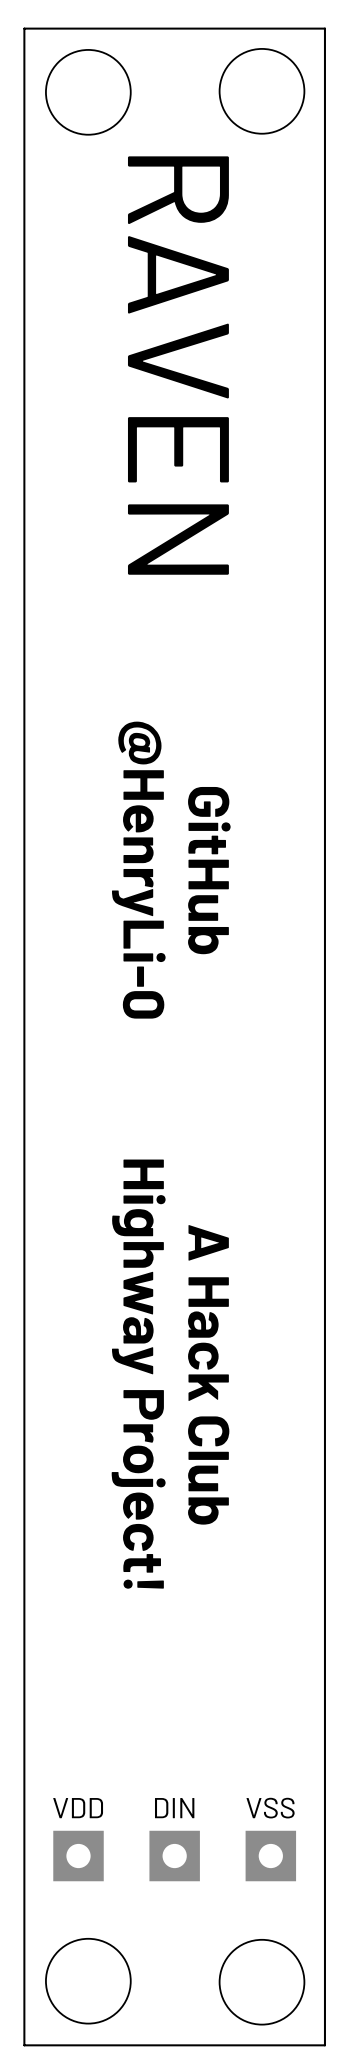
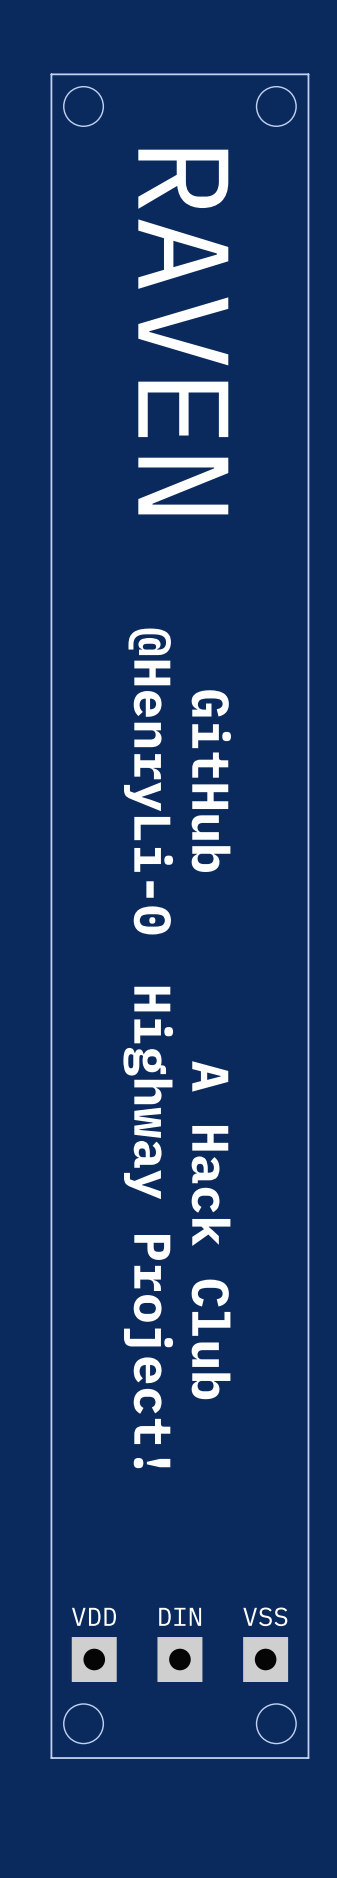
board edge: (324, 28) (24, 28) (24, 2045) (324, 2045) (324, 28) -> (308, 74) (308, 1758) (51, 1758) (51, 74) (308, 74)
round board edge: [219, 48, 305, 135] -> none
round board edge: [45, 49, 132, 136] -> none
round board edge: none -> [63, 86, 104, 127]
round board edge: none -> [256, 86, 297, 127]
round board edge: none -> [63, 1703, 104, 1745]
round board edge: none -> [256, 1703, 297, 1745]
round board edge: [45, 1938, 132, 2025] -> none
round board edge: [219, 1939, 305, 2026] -> none

